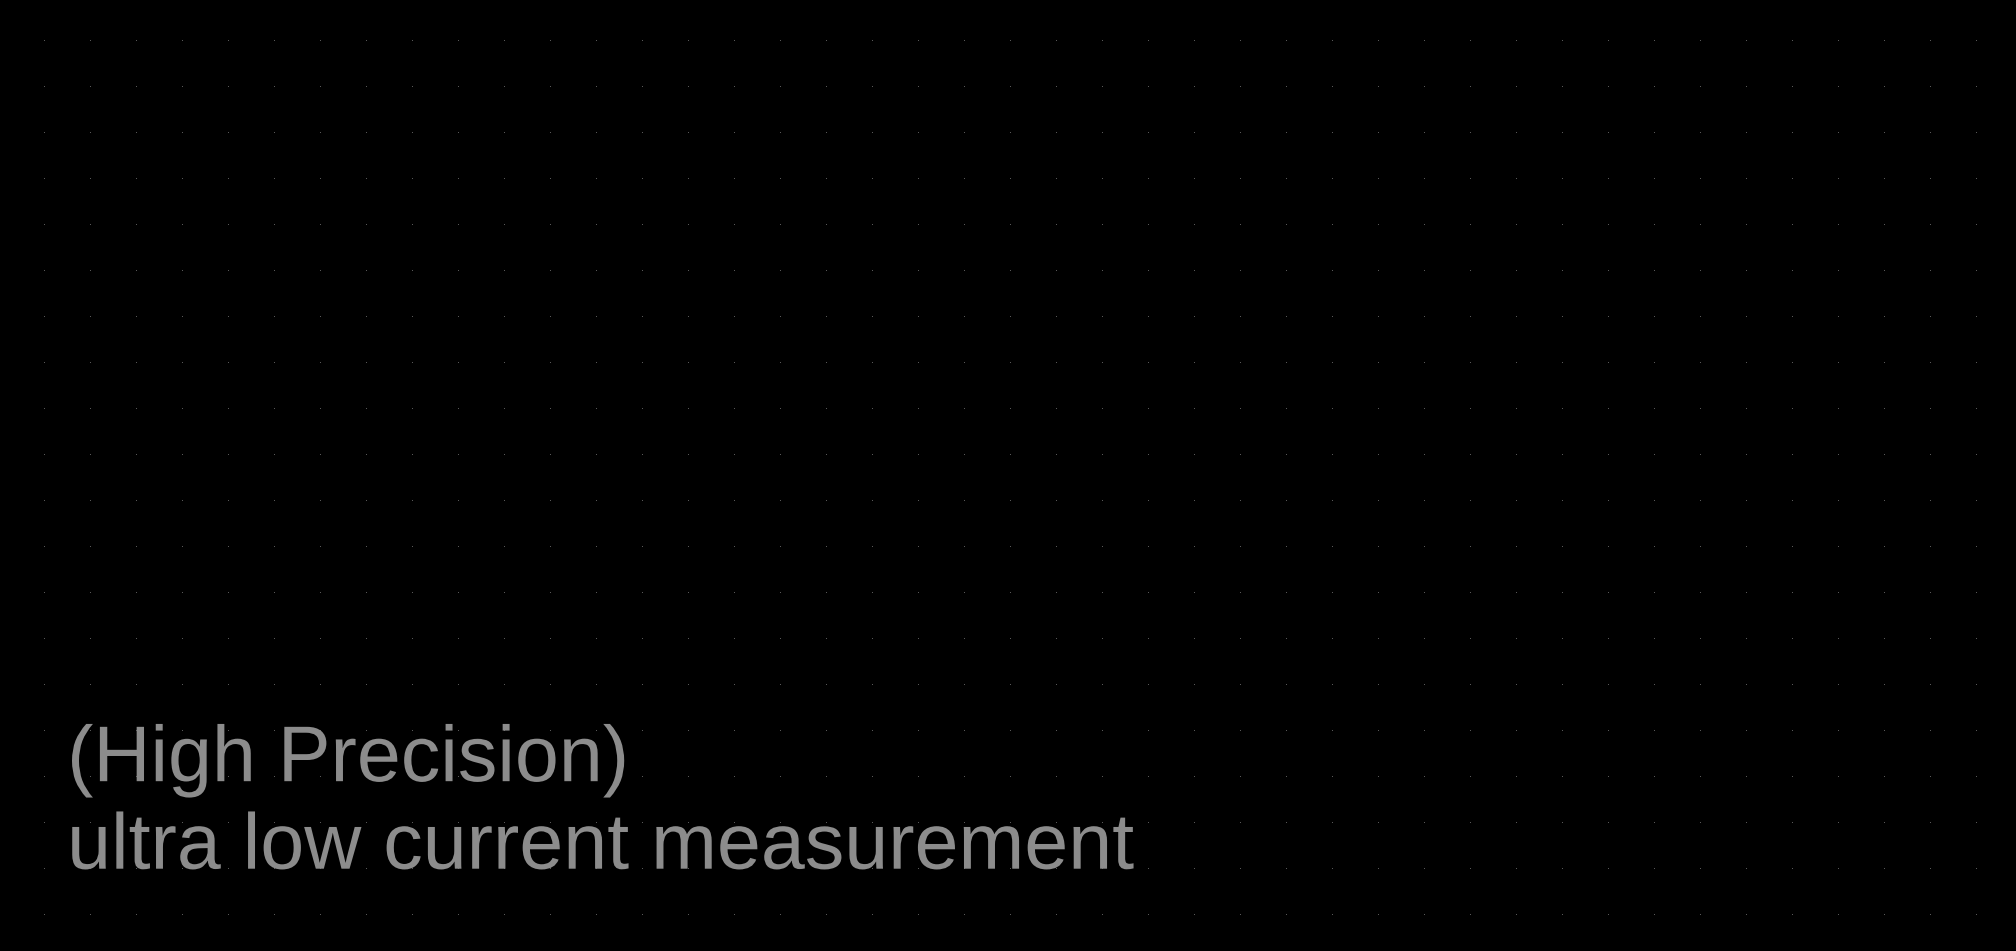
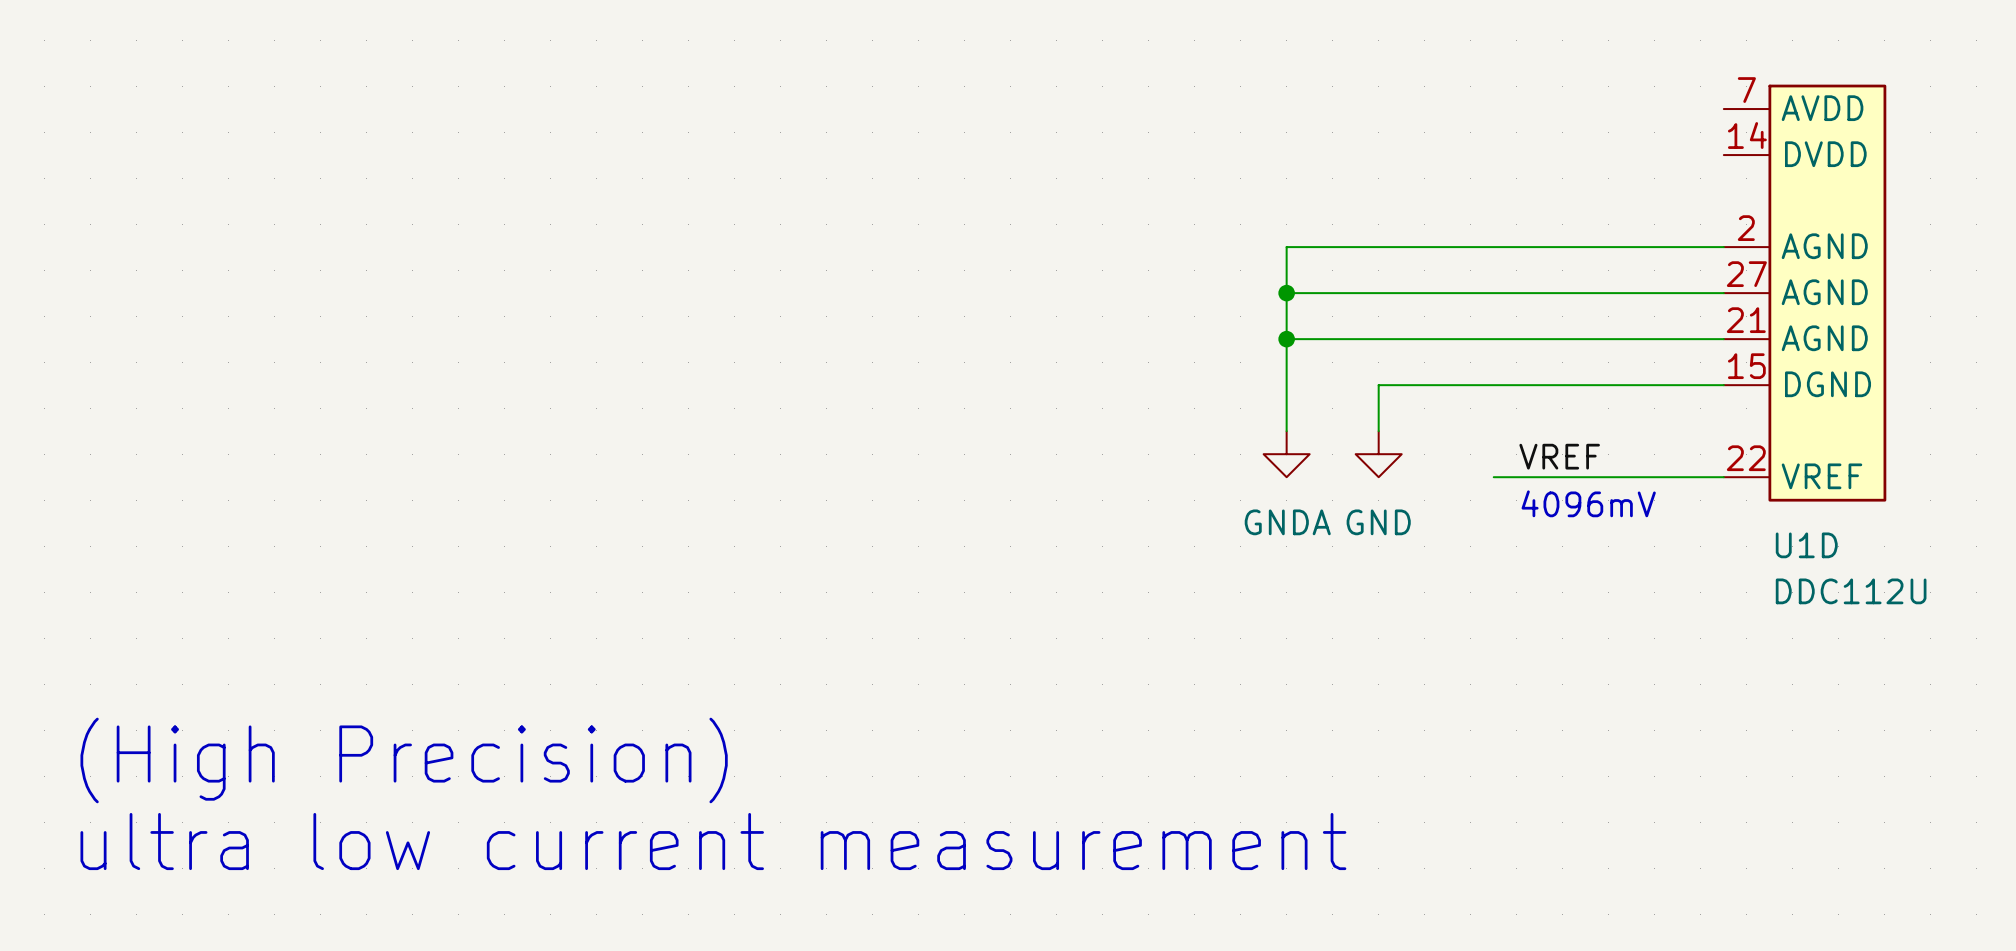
wire: none -> (1723, 247) (1286, 247) (1286, 431)
wire: none -> (1286, 293) (1723, 293)
junction: none -> (1286, 293)
U1D: none -> DDC112U (1805, 293)
wire: none -> (1286, 339) (1723, 339)
junction: none -> (1286, 339)
wire: none -> (1723, 385) (1378, 385) (1378, 431)
power symbol: none -> GNDA (1286, 454)
power symbol: none -> GND (1378, 454)
label: none -> VREF (1559, 456)
wire: none -> (1493, 477) (1723, 477)
text: none -> 4096mV (1588, 503)

